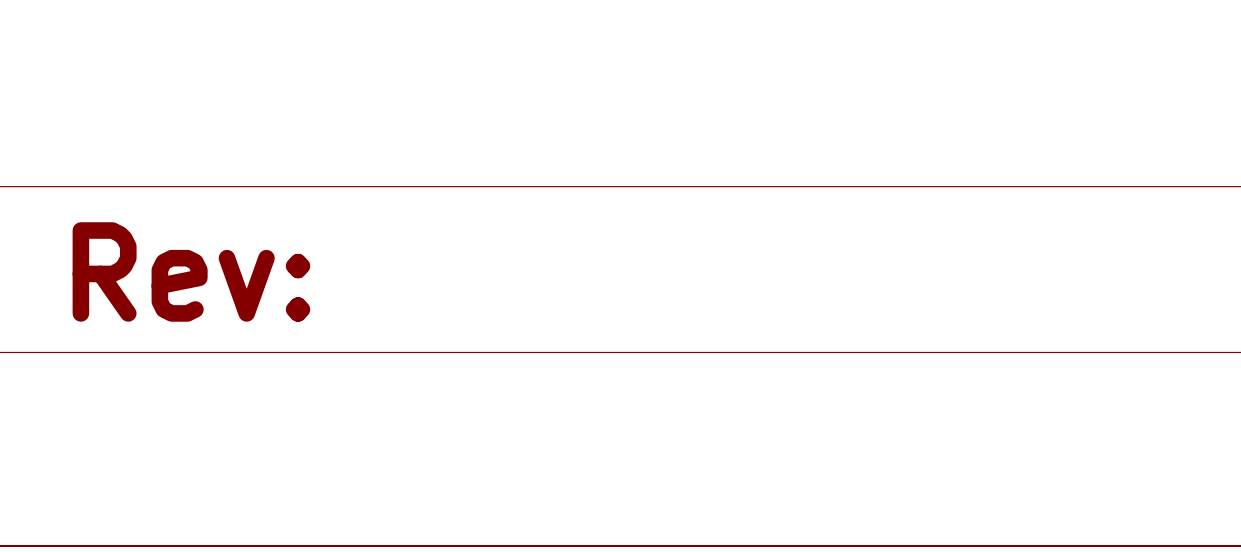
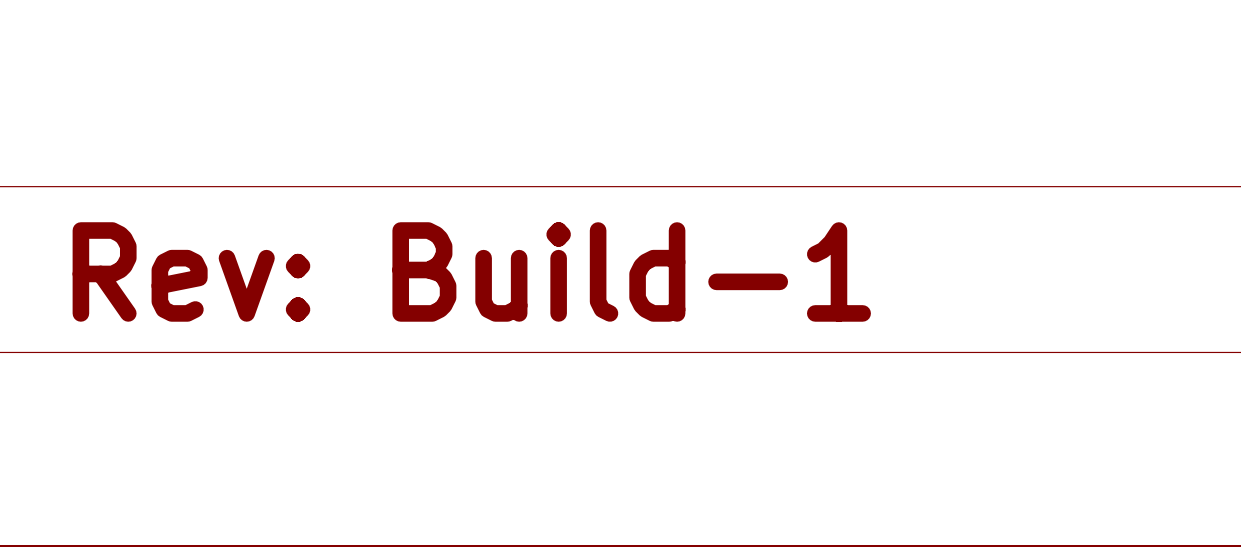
title block: Rev: (191, 271) -> Rev: Build-1 (471, 271)

